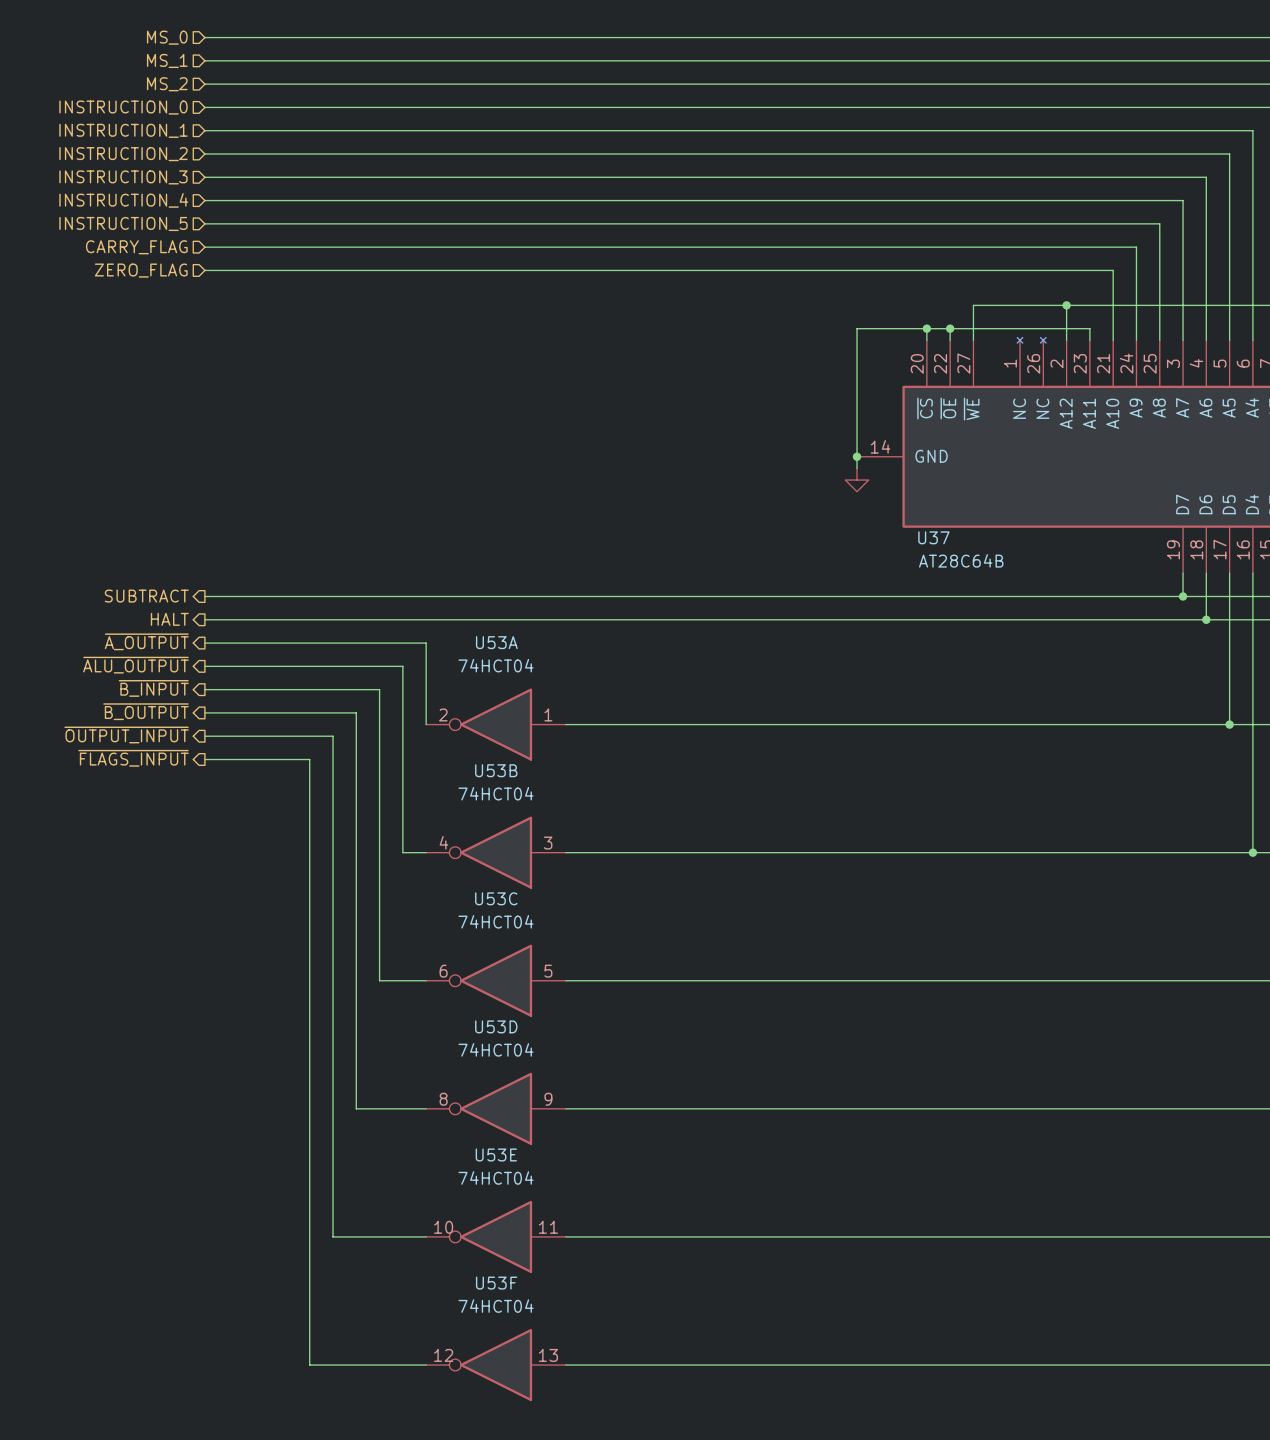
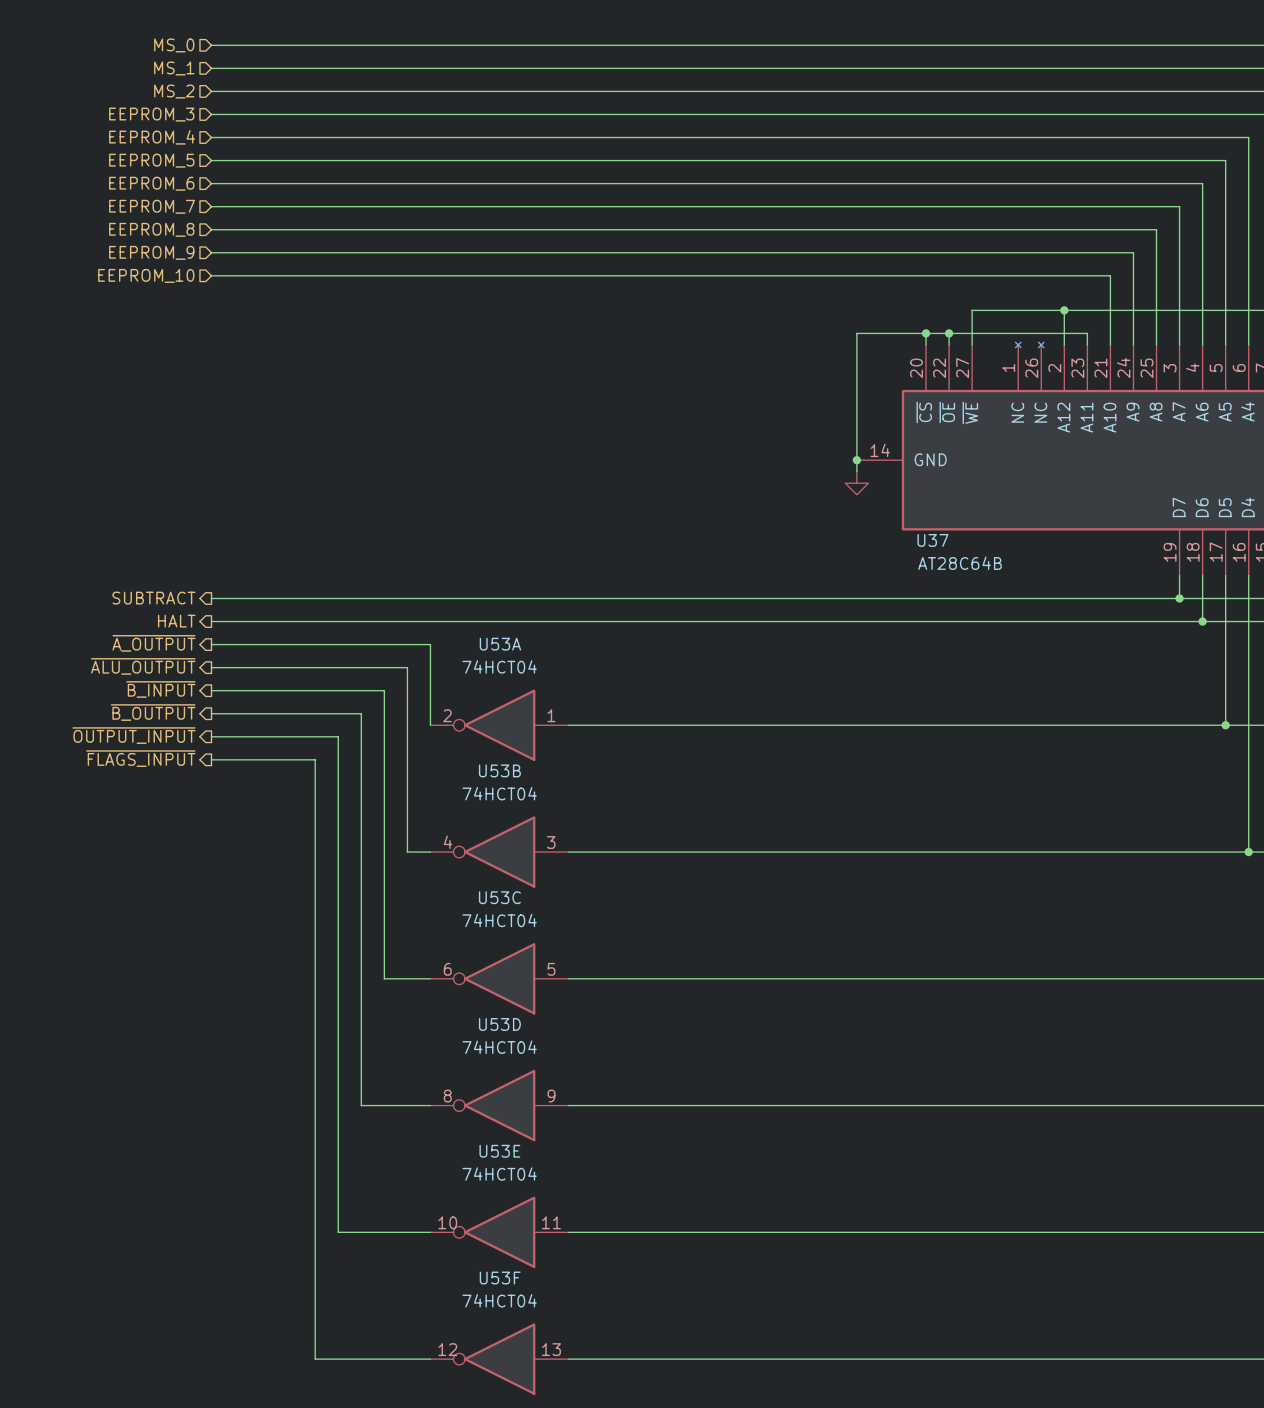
hierarchical label: INSTRUCTION_0 (123, 107) -> EEPROM_3 (151, 114)
hierarchical label: INSTRUCTION_1 (123, 130) -> EEPROM_4 (152, 137)
hierarchical label: INSTRUCTION_2 (123, 154) -> EEPROM_5 (151, 160)
hierarchical label: INSTRUCTION_3 (123, 177) -> EEPROM_6 (151, 183)
hierarchical label: INSTRUCTION_4 (123, 200) -> EEPROM_7 (152, 206)
hierarchical label: INSTRUCTION_5 (123, 223) -> EEPROM_8 (151, 229)
hierarchical label: CARRY_FLAG (136, 247) -> EEPROM_9 (151, 252)
hierarchical label: ZERO_FLAG (141, 270) -> EEPROM_10 (146, 275)

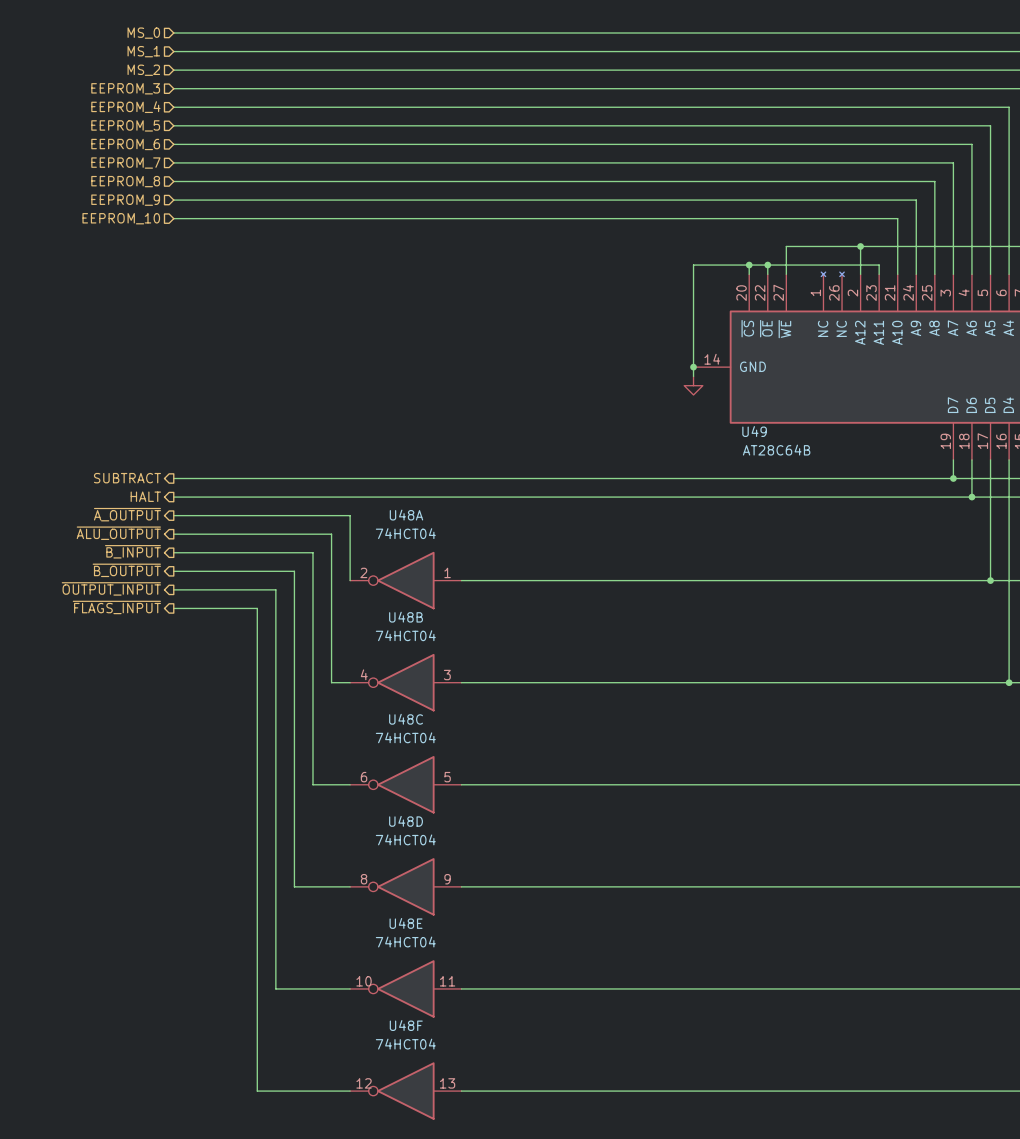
U37 name: U37 (932, 540) -> U49 (754, 431)
U53A name: U53A (500, 644) -> U48A (406, 515)
U53B name: U53B (499, 770) -> U48B (406, 617)
U53C name: U53C (499, 897) -> U48C (406, 719)
U53D name: U53D (499, 1024) -> U48D (406, 821)
U53E name: U53E (499, 1151) -> U48E (406, 923)
U53F name: U53F (500, 1278) -> U48F (406, 1025)

